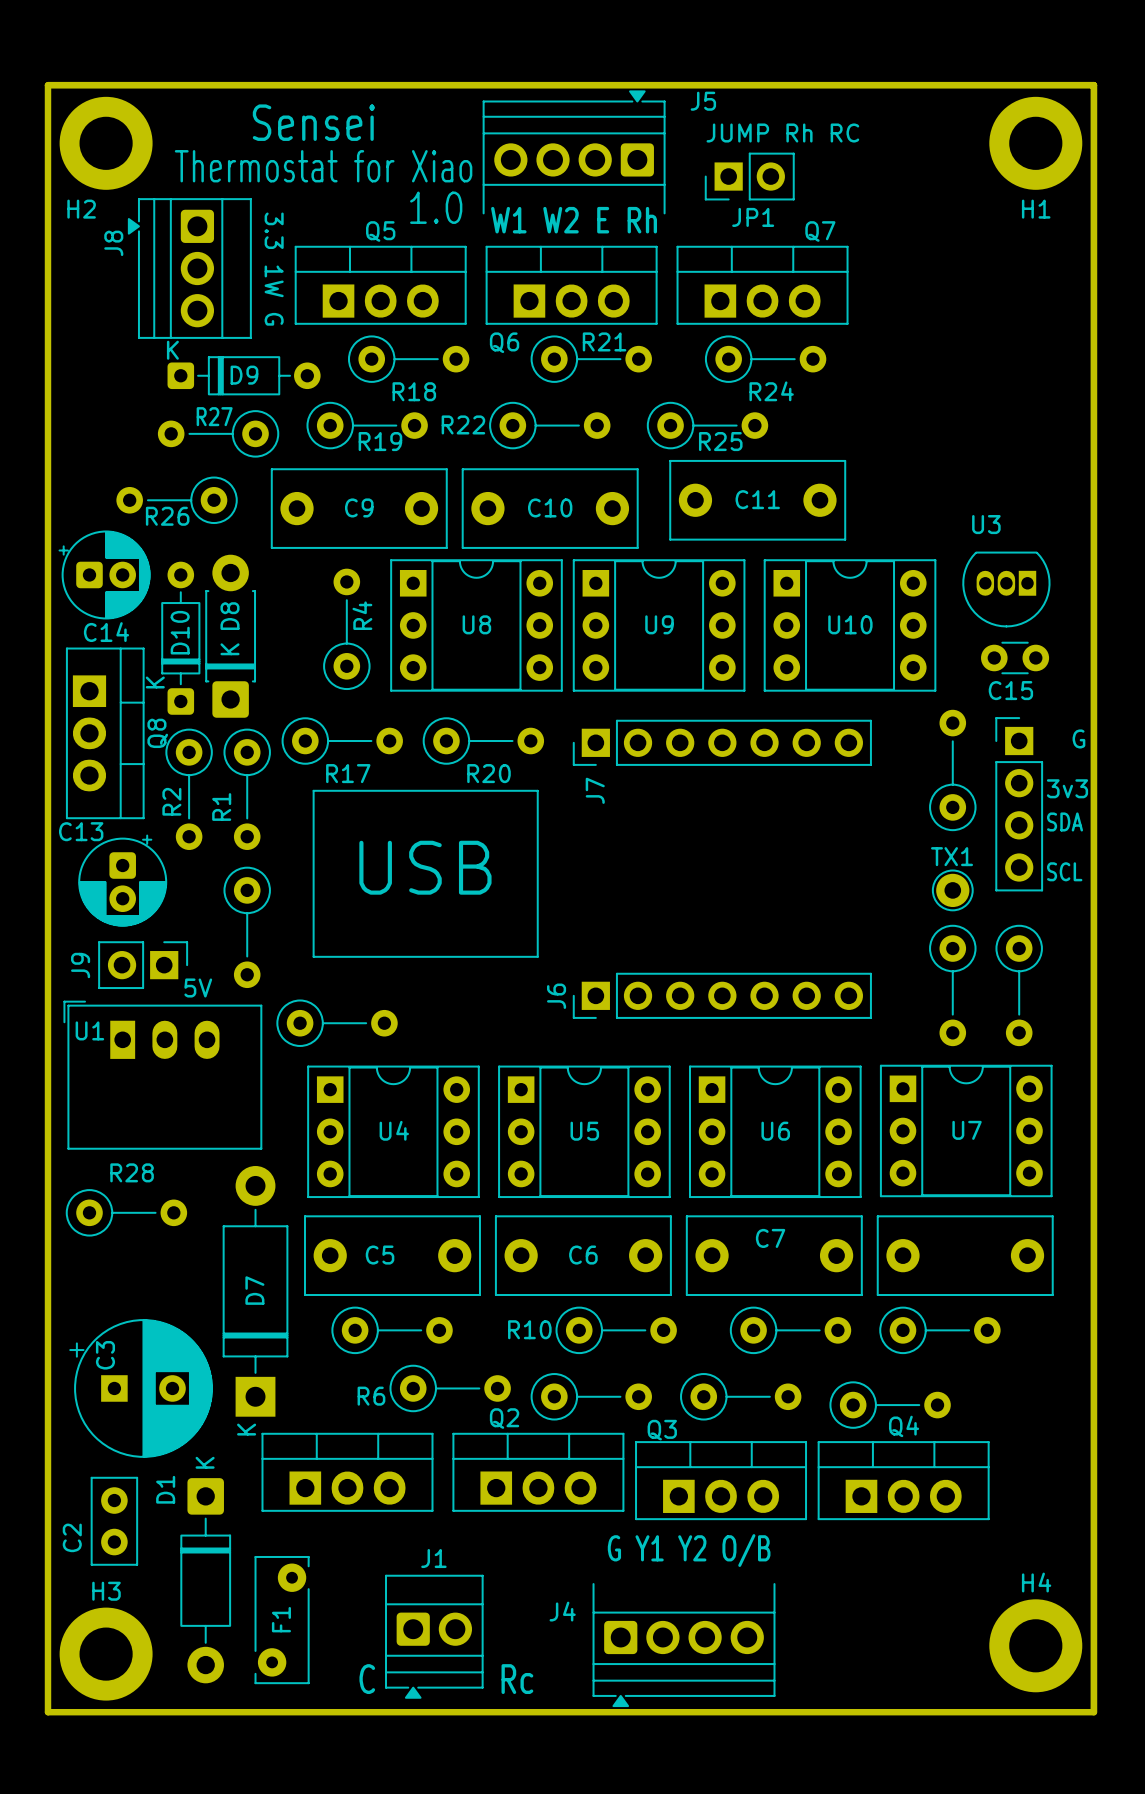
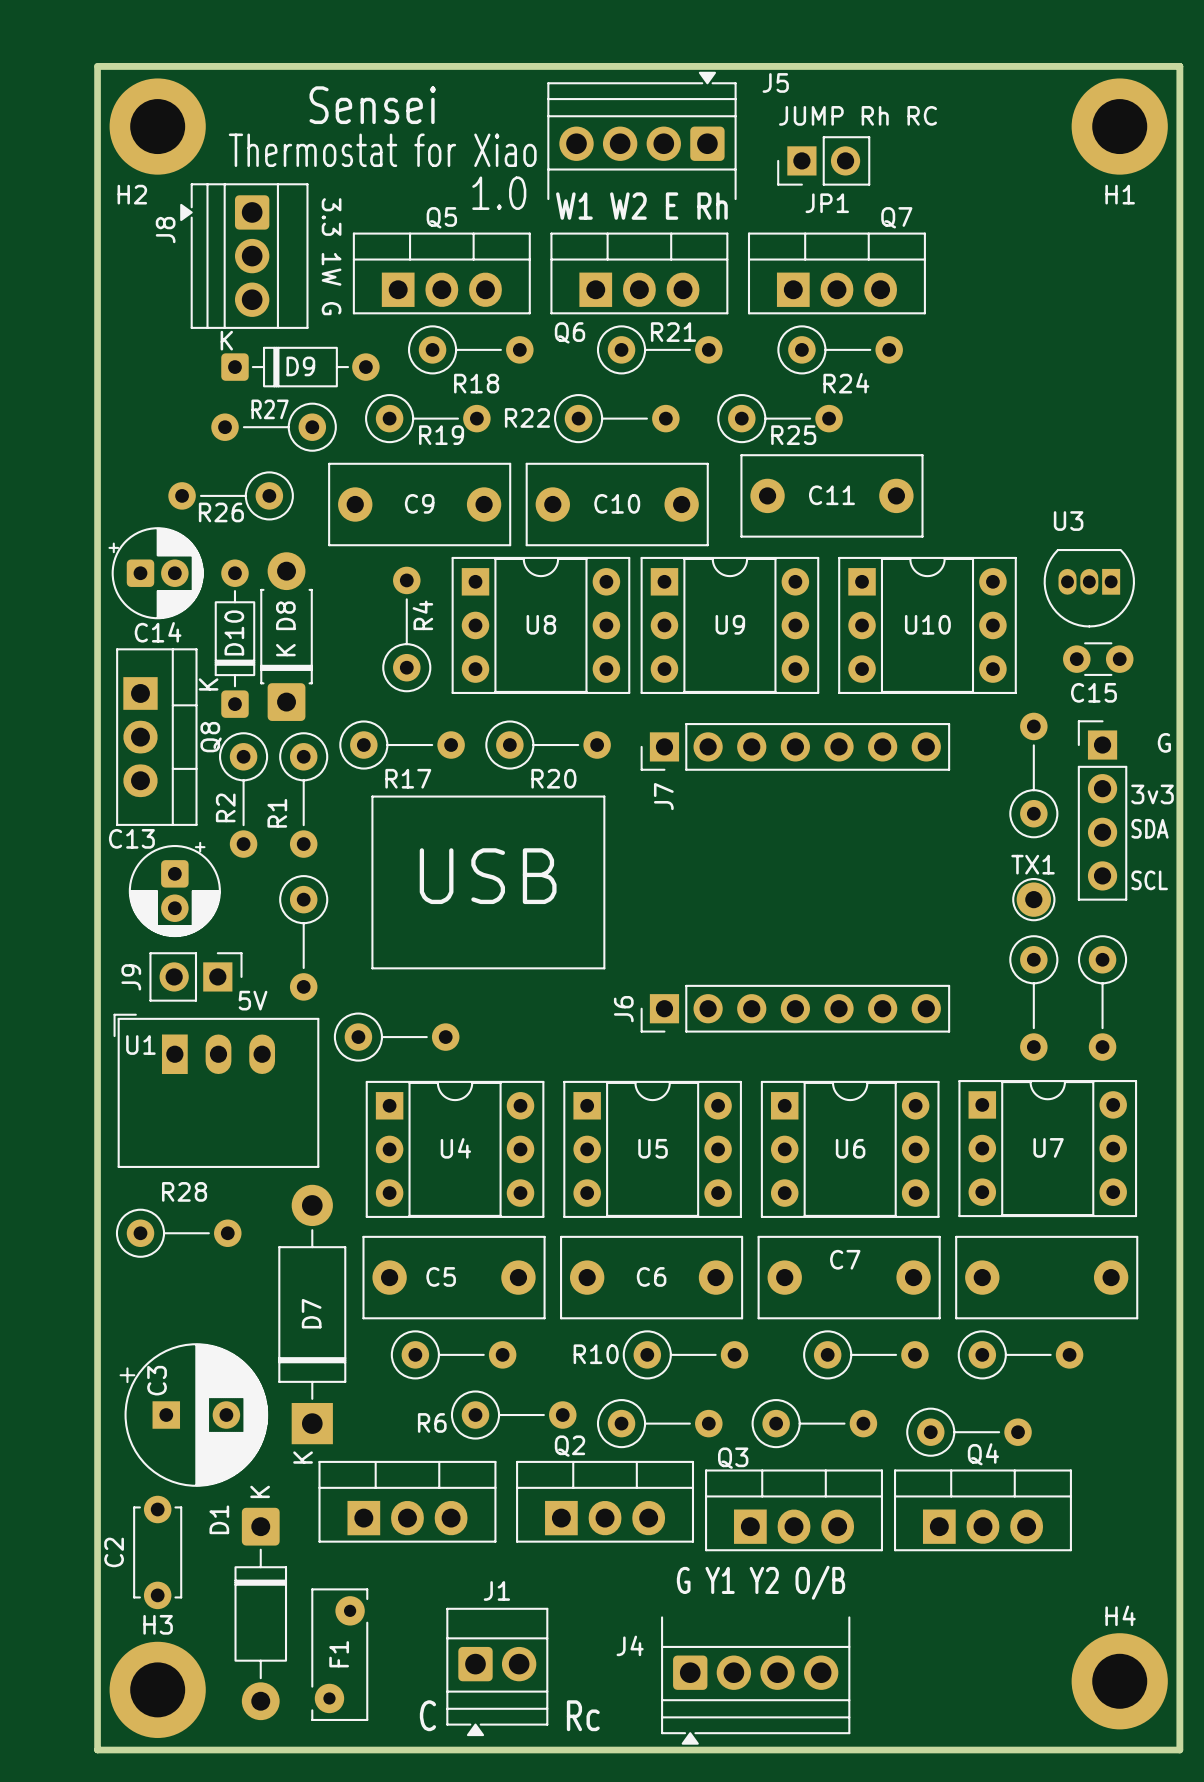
C2 footprint: [90, 1476, 139, 1566] -> [133, 1495, 183, 1610]

